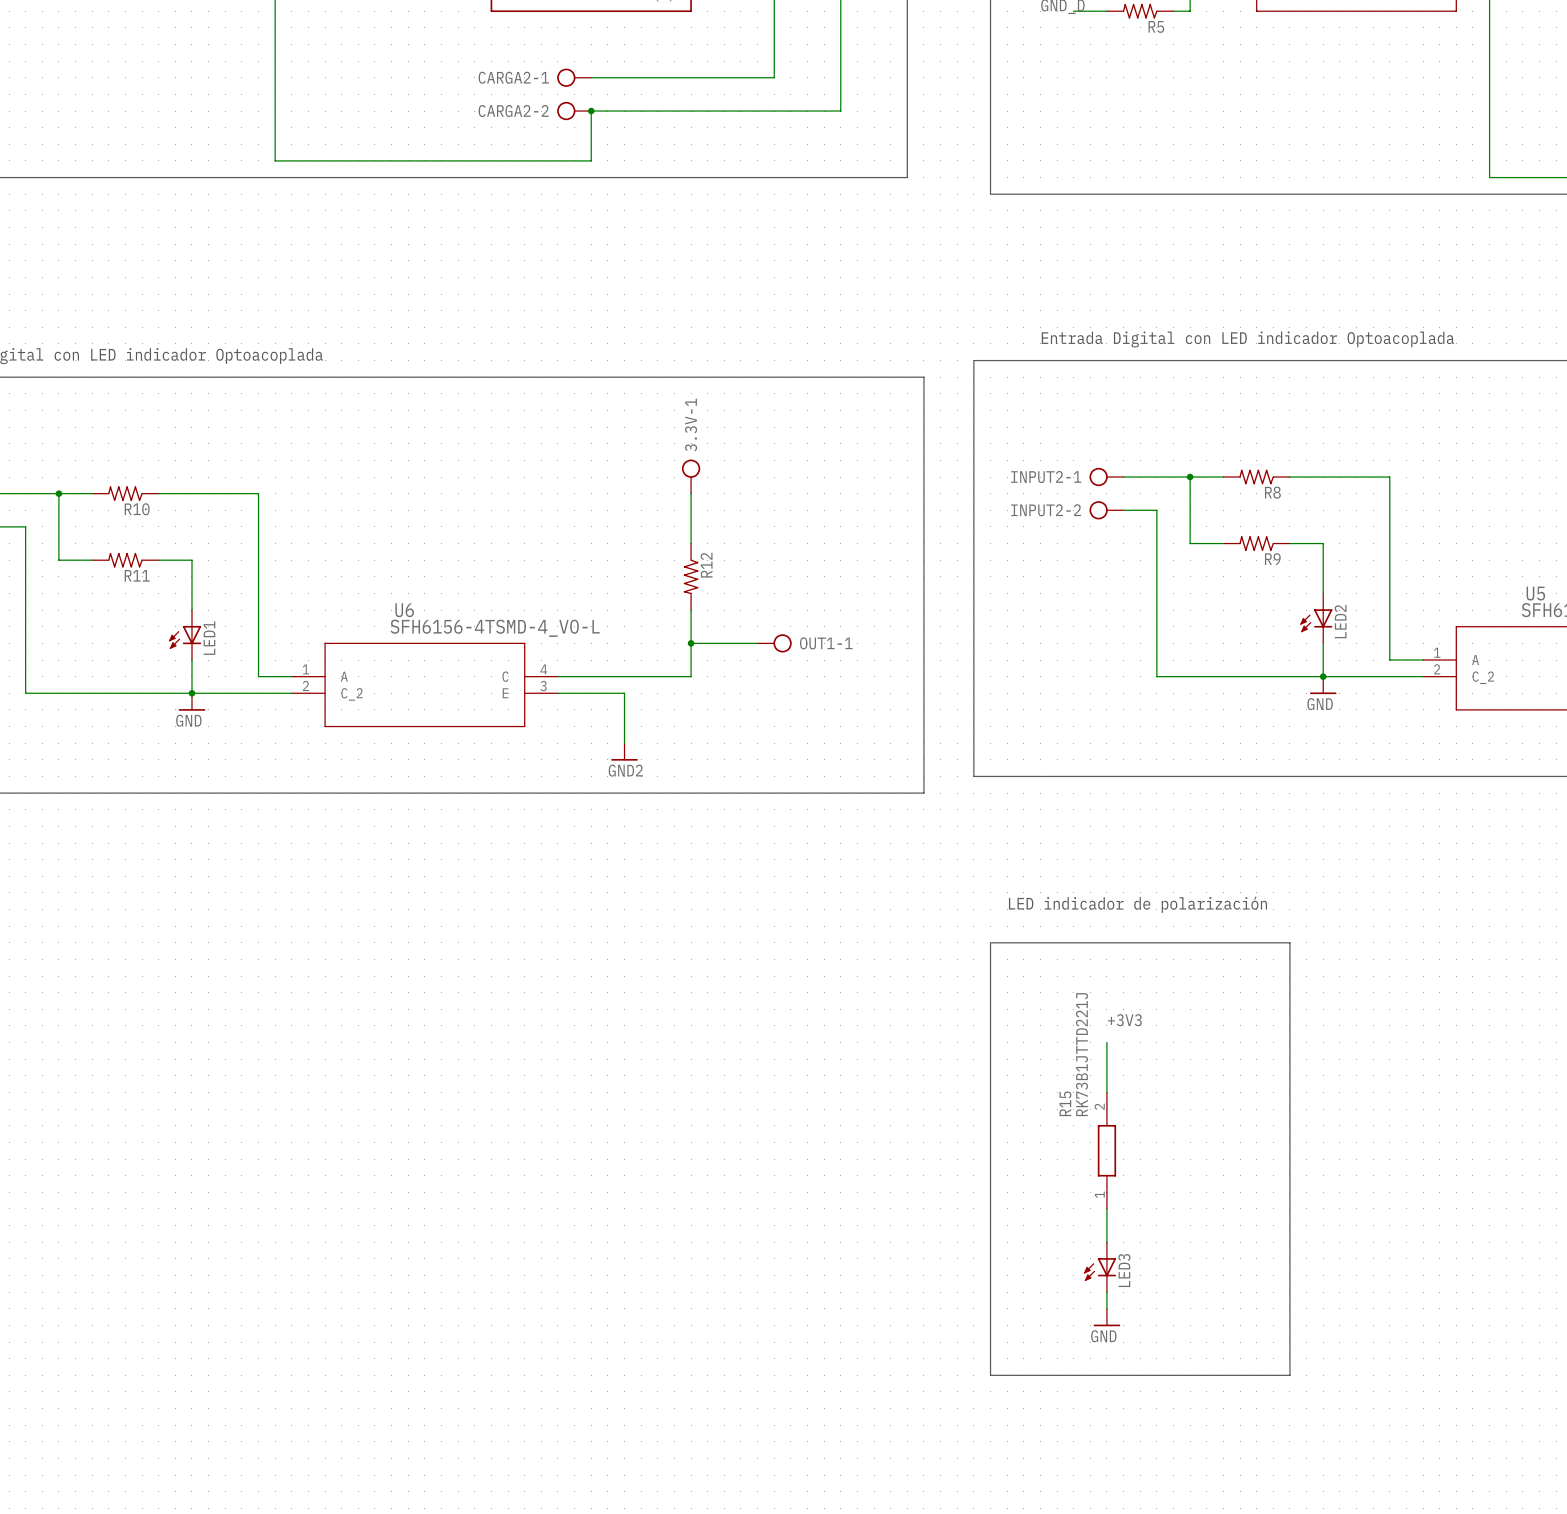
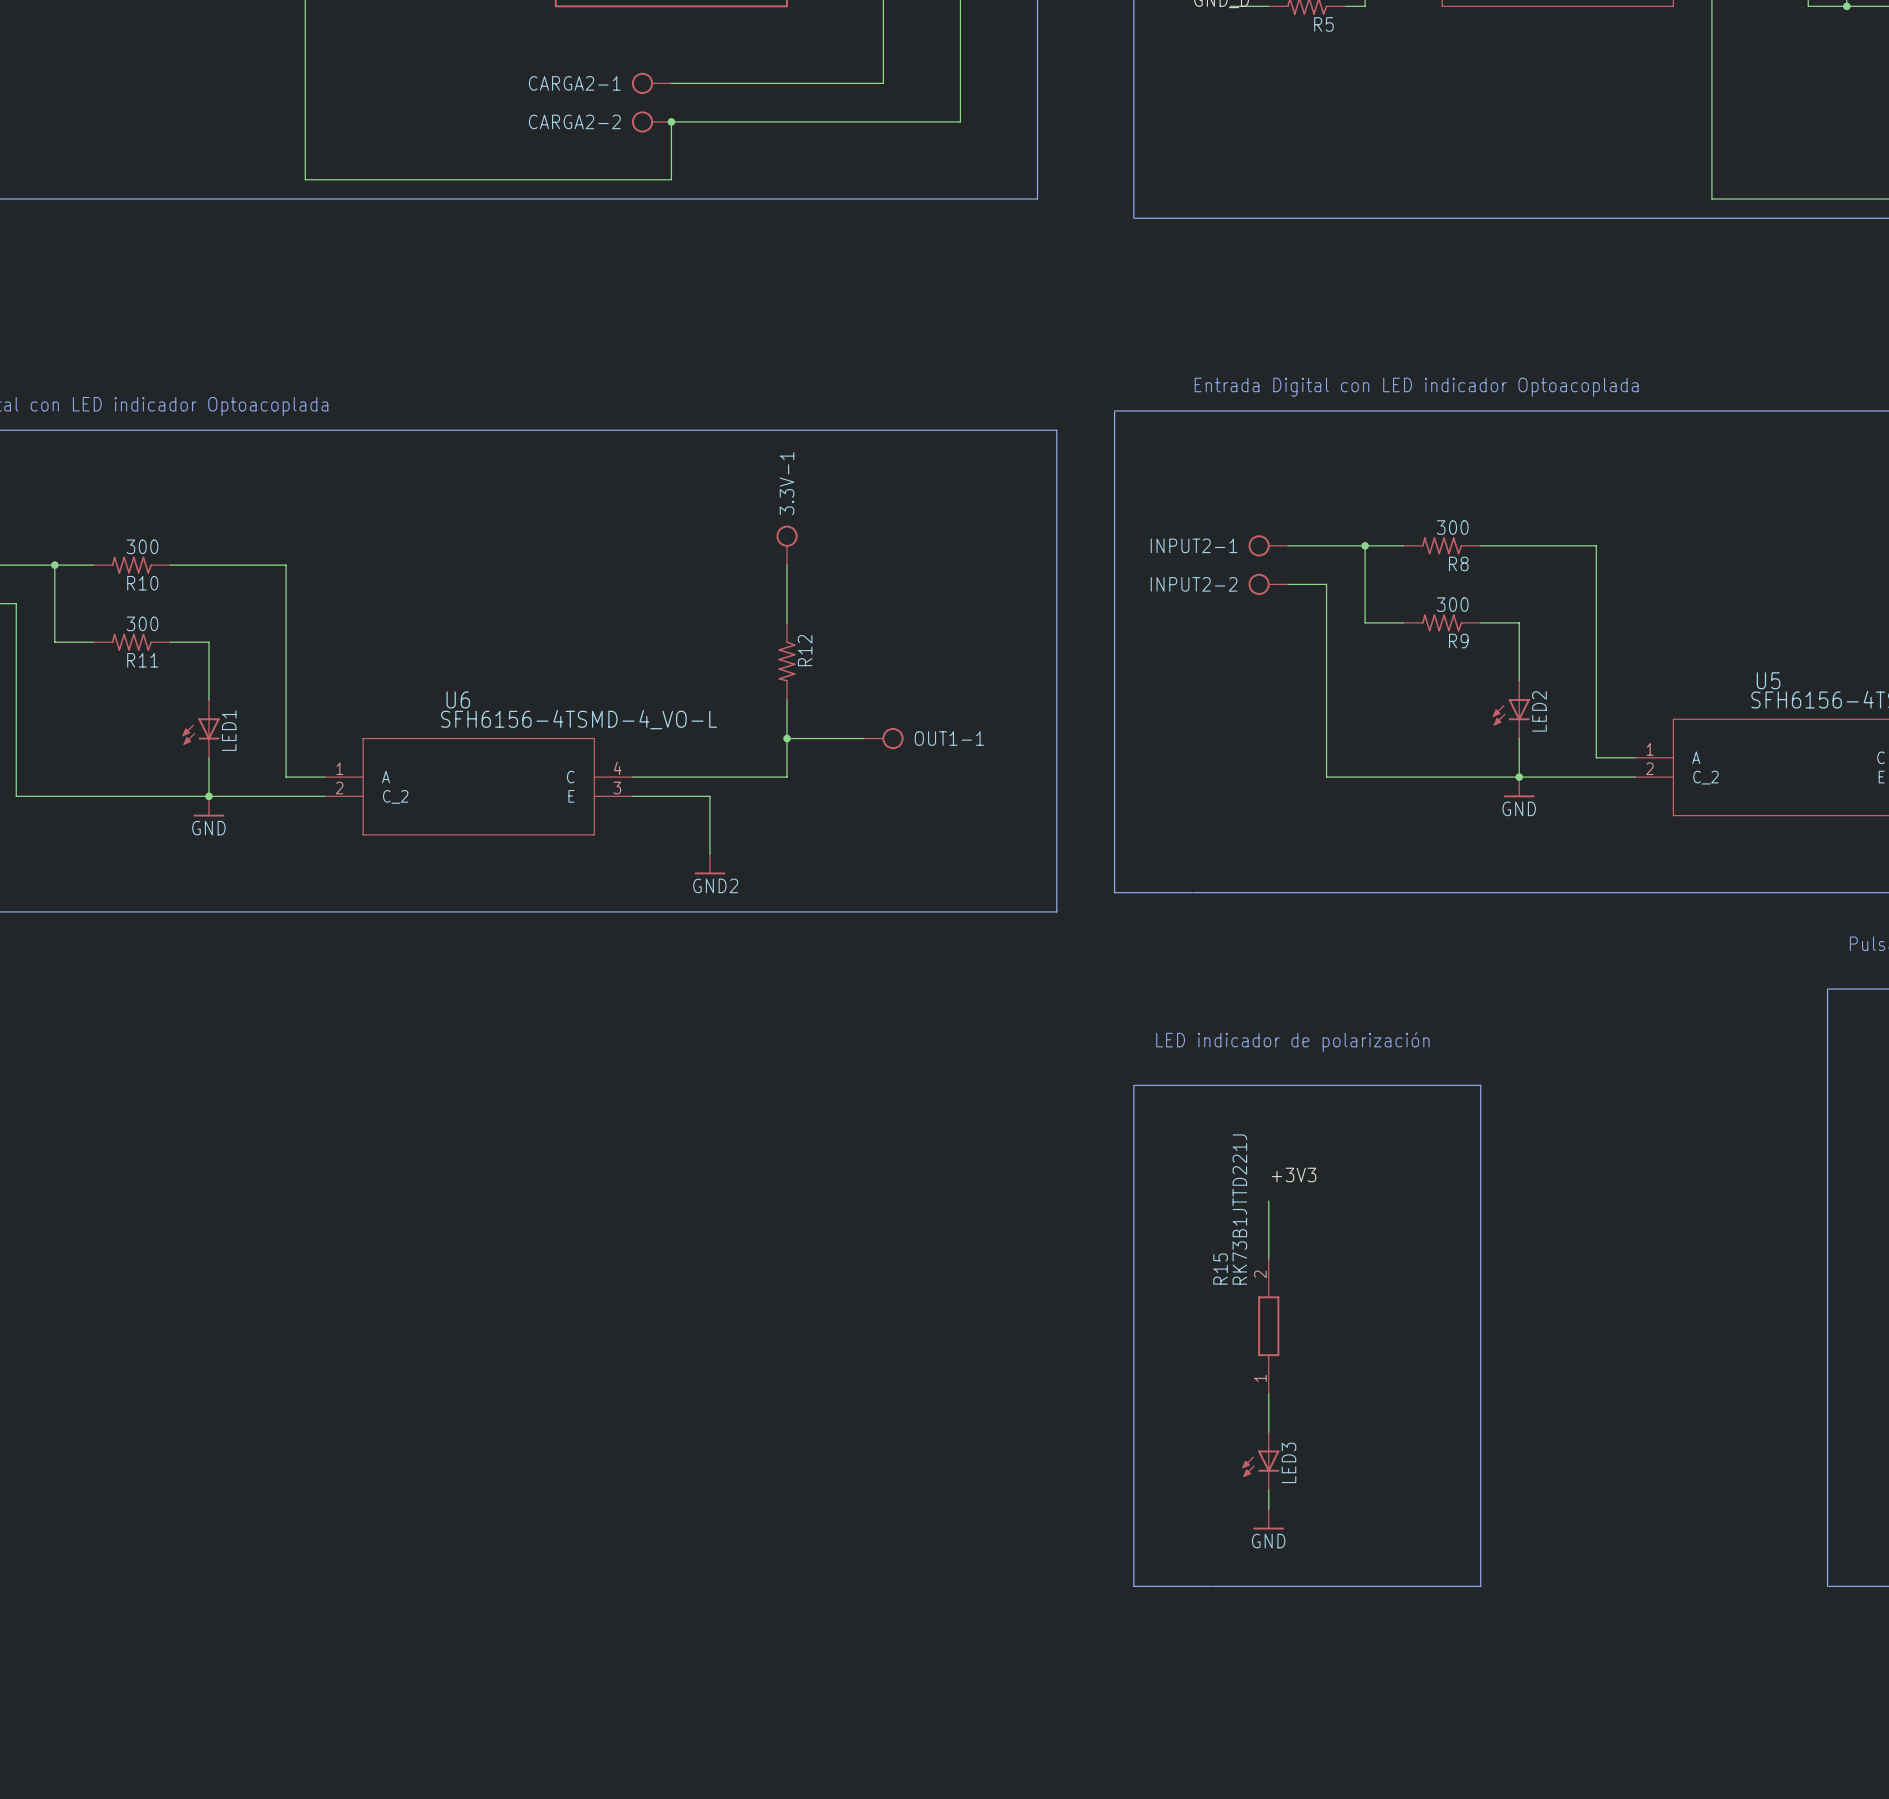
R8 value: none -> 300 (1452, 527)
R10 value: none -> 300 (142, 546)
R9 value: none -> 300 (1452, 604)
R11 value: none -> 300 (142, 623)

